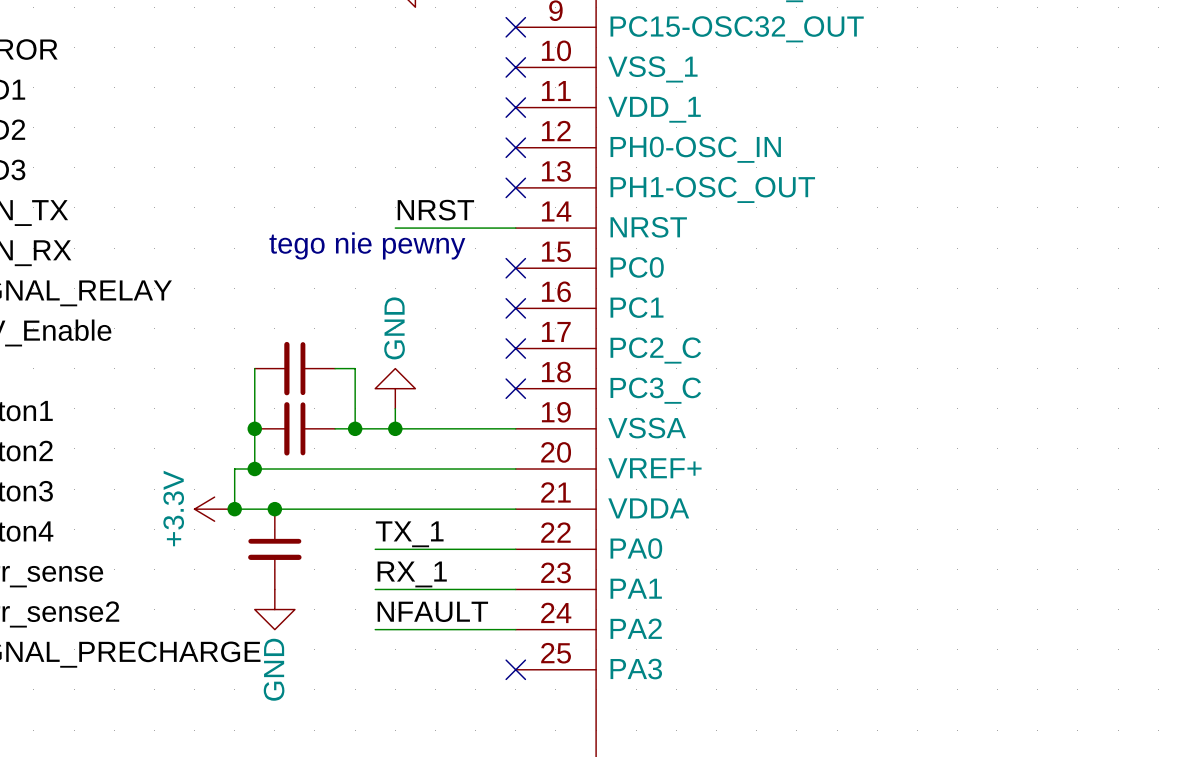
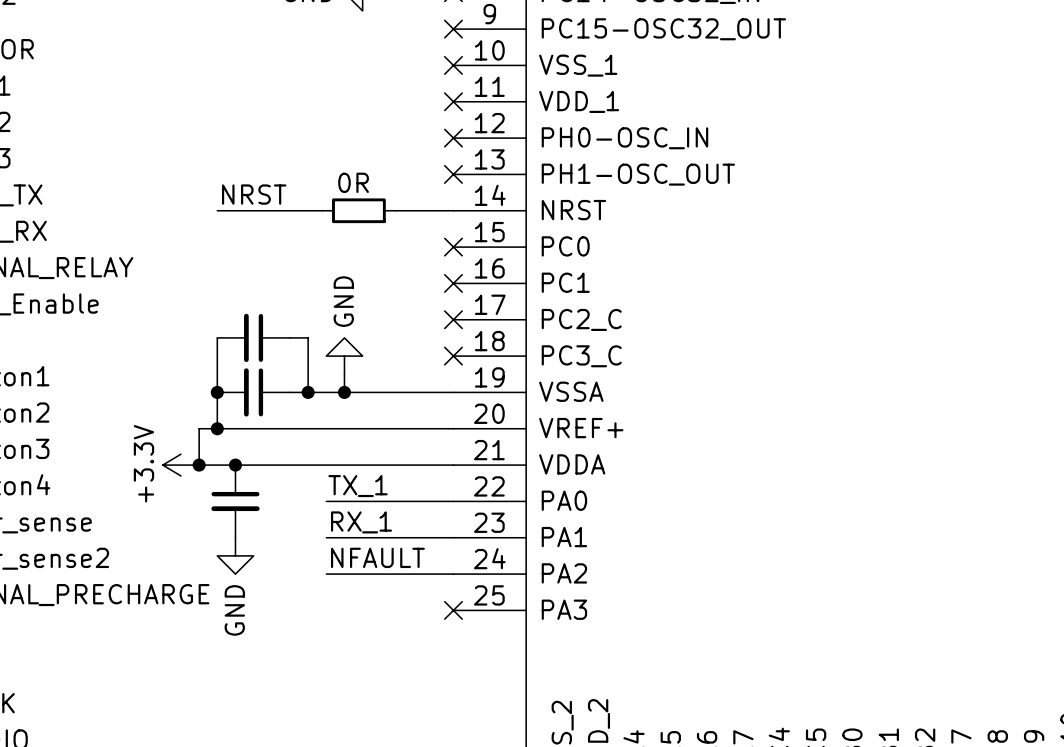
label position: NRST (435, 210) -> NRST (254, 194)
wire: none -> (217, 210) (322, 210)
wire: (395, 228) (451, 228) -> none
part: none -> 0R (358, 210)
text: tego nie pewny (367, 245) -> none

